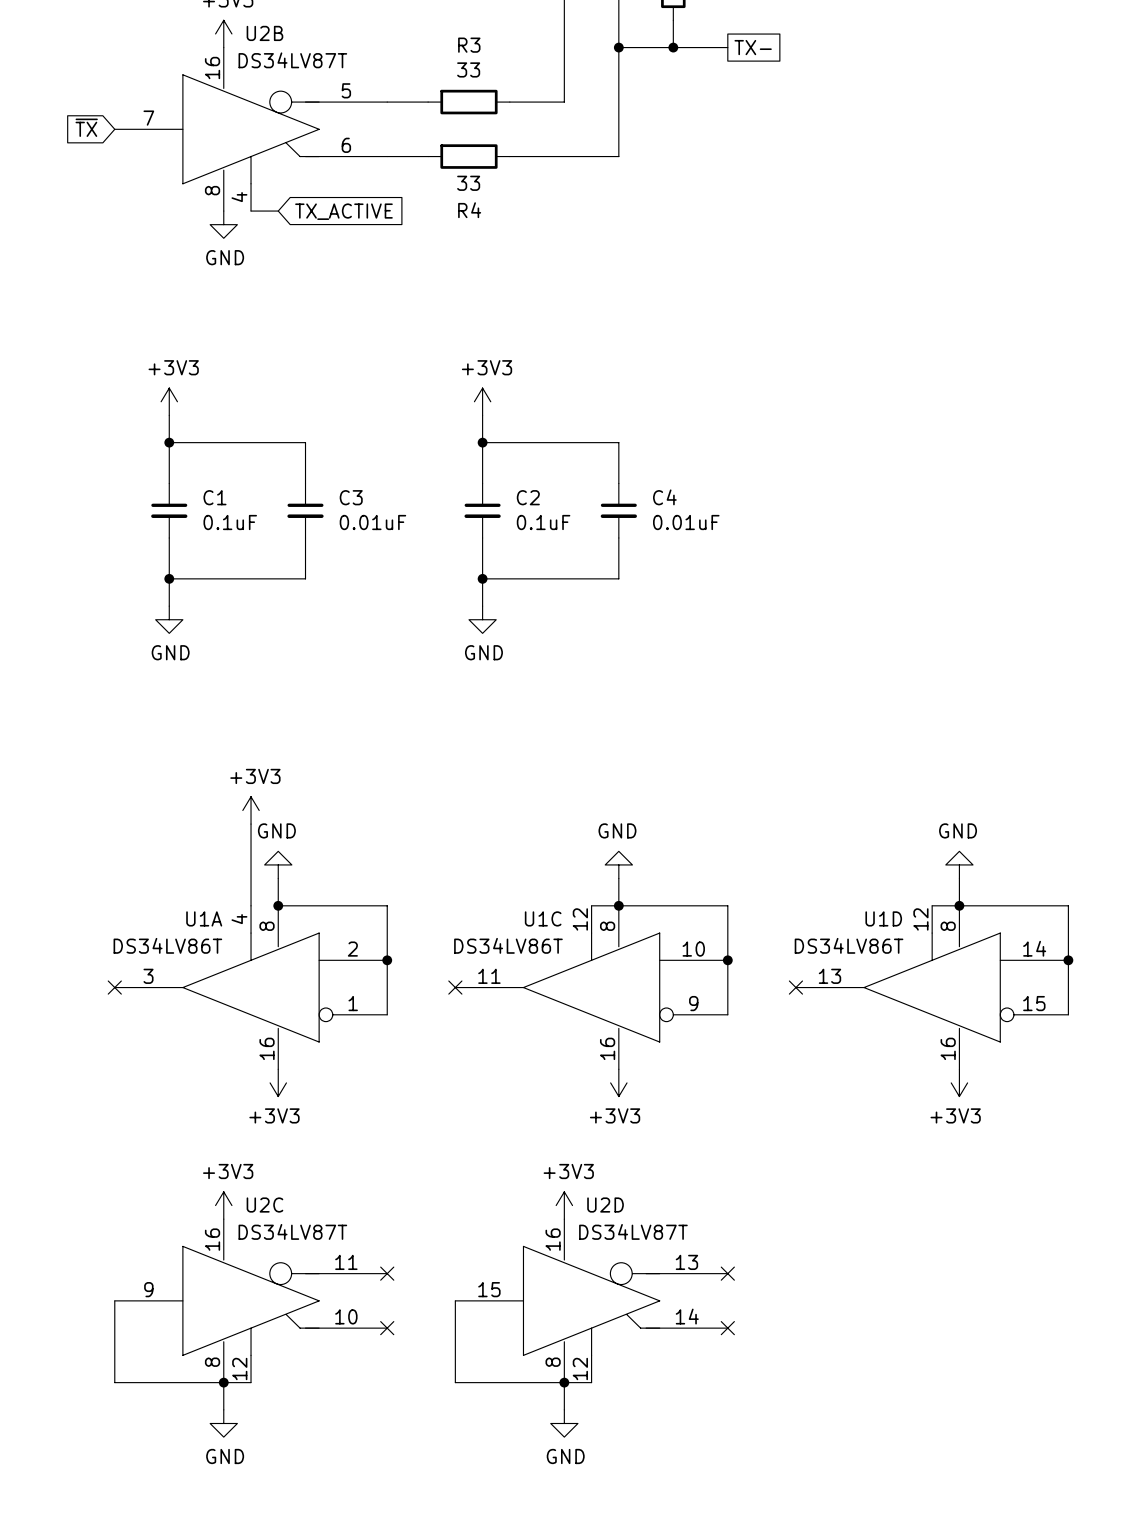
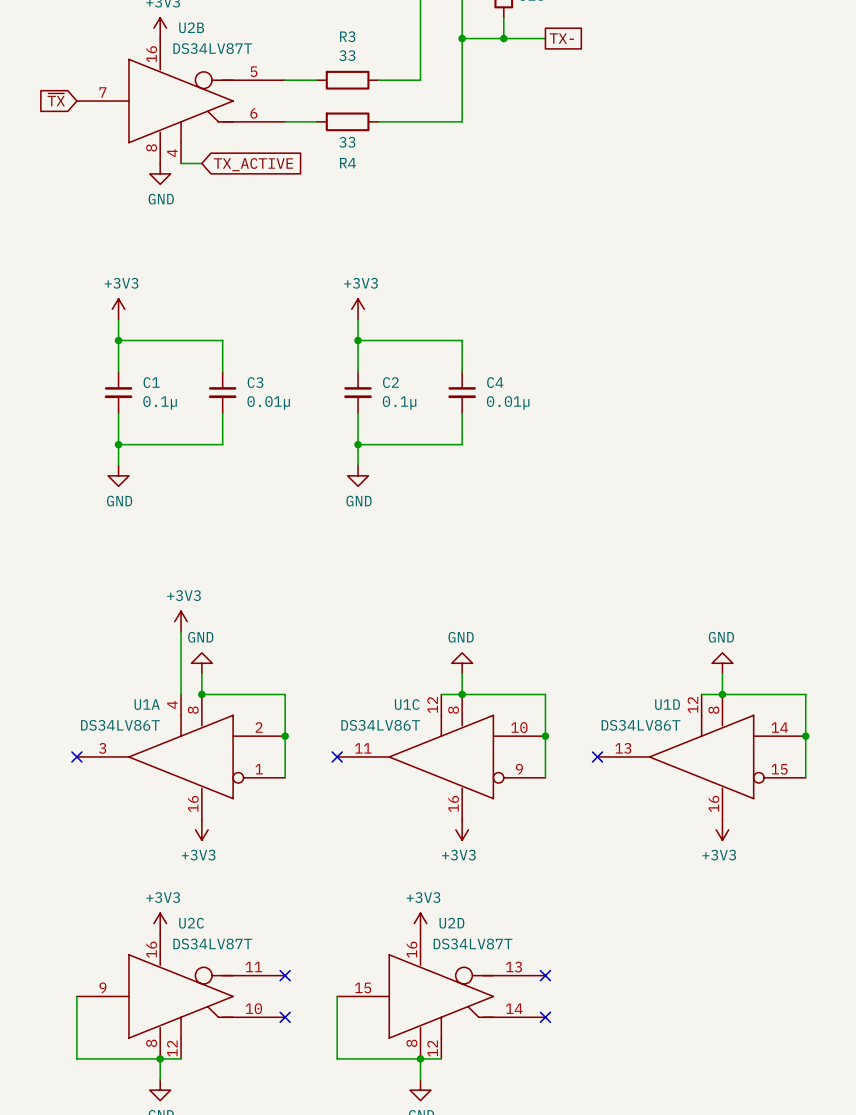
C1 value: 0.1uF (230, 522) -> 0.1µ (160, 402)
C3 value: 0.01uF (372, 522) -> 0.01µ (268, 402)
C2 value: 0.1uF (543, 522) -> 0.1µ (399, 402)
C4 value: 0.01uF (686, 522) -> 0.01µ (508, 402)

